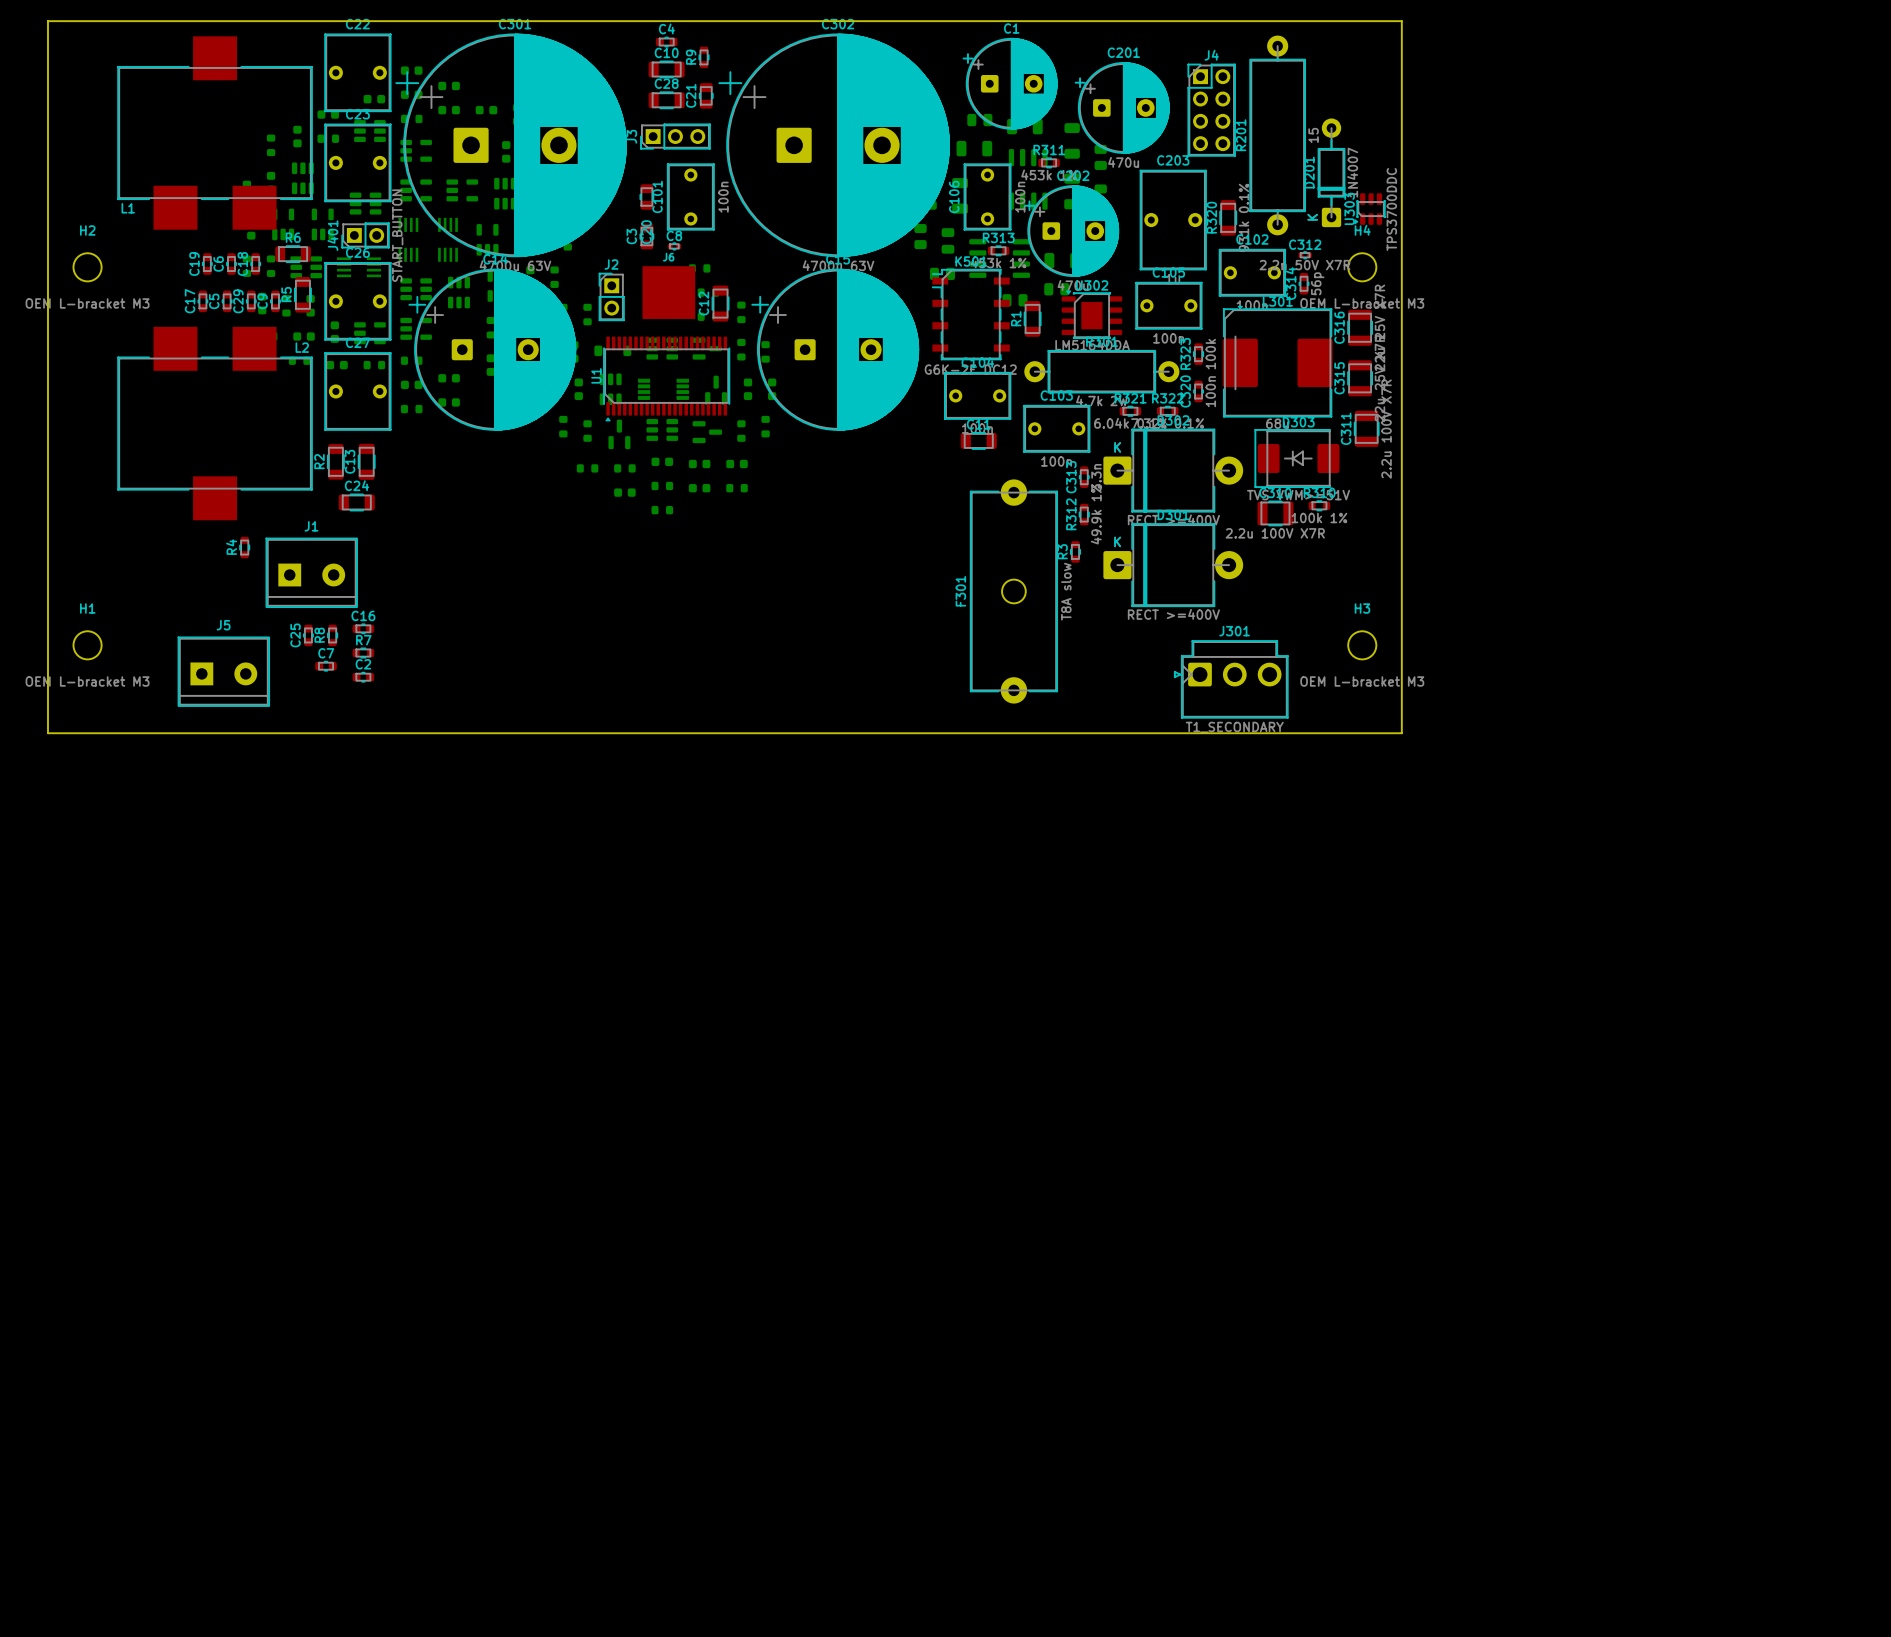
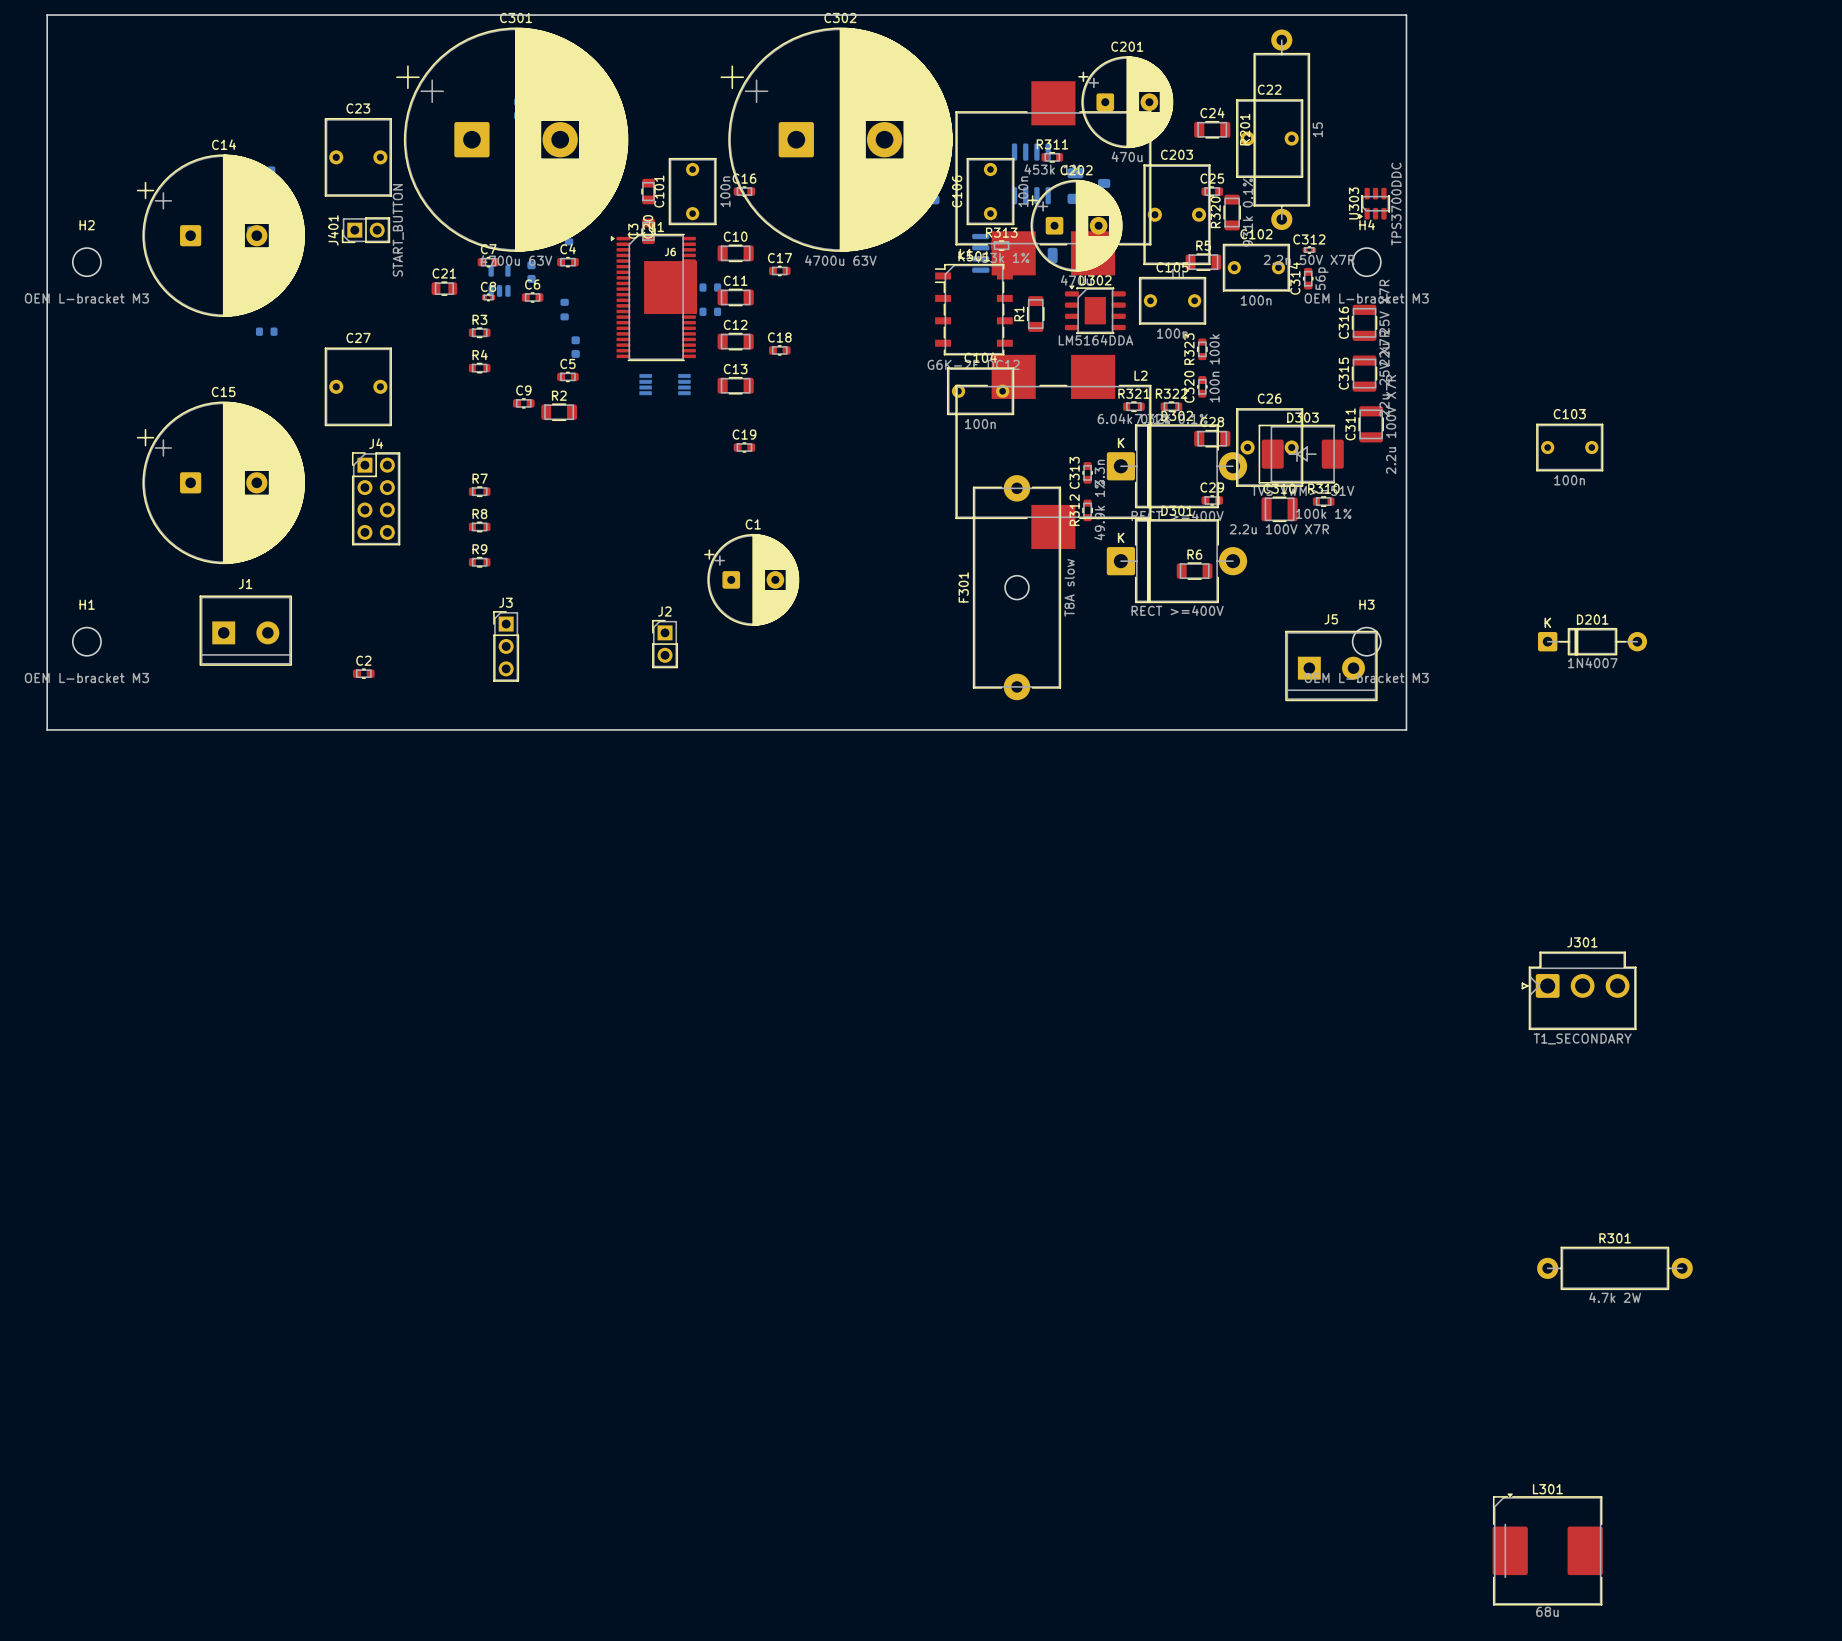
C4 position: (666, 42) -> (567, 262)
R9 rotation: 0° (704, 57) -> 90° clockwise (479, 562)
R9 position: (704, 57) -> (479, 562)
C10 position: (666, 69) -> (735, 253)
part: (411, 70) -> none
C22 position: (357, 72) -> (1269, 138)
C1 position: (1010, 83) -> (751, 579)
part: (449, 85) -> none
part: (411, 94) -> none
C21 rotation: 0° (706, 95) -> 90° clockwise (444, 288)
C21 position: (706, 95) -> (444, 288)
part: (374, 99) -> none
C28 position: (666, 100) -> (1212, 438)
part: (449, 110) -> none
part: (486, 110) -> none
J4 position: (1211, 110) -> (376, 498)
part: (328, 114) -> none
part: (411, 118) -> none
part: (979, 120) -> none
part: (1024, 126) -> none
part: (369, 131) -> none
L1 position: (215, 133) -> (1053, 178)
part: (297, 136) -> none
J3 rotation: 0° (675, 136) -> 90° clockwise (506, 646)
J3 position: (675, 136) -> (506, 646)
part: (328, 138) -> none
part: (1072, 140) -> none
part: (271, 145) -> none
part: (974, 148) -> none
part: (416, 150) -> none
part: (506, 151) -> none
part: (1100, 157) -> none
D201 rotation: 0° (1331, 172) -> 90° clockwise (1592, 641)
D201 position: (1331, 172) -> (1592, 641)
part: (302, 178) -> none
part: (416, 190) -> none
part: (462, 190) -> none
part: (505, 193) -> none
part: (960, 195) -> none
part: (365, 203) -> none
part: (283, 224) -> none
part: (322, 224) -> none
part: (920, 236) -> none
part: (408, 239) -> none
part: (447, 239) -> none
part: (487, 239) -> none
part: (947, 240) -> none
C8 position: (674, 246) -> (488, 297)
R6 position: (293, 254) -> (1194, 571)
C19 rotation: 0° (207, 264) -> 90° clockwise (744, 447)
C19 position: (207, 264) -> (744, 447)
C6 rotation: 0° (231, 264) -> 90° clockwise (532, 297)
C6 position: (231, 264) -> (532, 297)
C18 rotation: 0° (255, 264) -> 90° clockwise (779, 350)
C18 position: (255, 264) -> (779, 350)
part: (246, 266) -> none
part: (271, 266) -> none
part: (306, 267) -> none
part: (358, 267) -> none
part: (699, 268) -> none
part: (942, 273) -> none
part: (554, 277) -> none
part: (416, 289) -> none
part: (1056, 289) -> none
part: (458, 292) -> none
R5 rotation: 0° (302, 294) -> 90° clockwise (1203, 262)
R5 position: (302, 294) -> (1203, 262)
J2 position: (611, 296) -> (665, 644)
part: (1015, 300) -> none
C17 rotation: 0° (202, 301) -> 90° clockwise (779, 270)
C17 position: (202, 301) -> (779, 270)
C5 rotation: 0° (227, 301) -> 90° clockwise (567, 376)
C5 position: (227, 301) -> (567, 376)
C29 rotation: 0° (251, 301) -> 90° clockwise (1212, 500)
C29 position: (251, 301) -> (1212, 500)
C9 rotation: 0° (275, 301) -> 90° clockwise (523, 403)
C9 position: (275, 301) -> (523, 403)
C26 position: (357, 301) -> (1269, 447)
part: (262, 303) -> none
C12 rotation: 0° (720, 303) -> 90° clockwise (735, 341)
C12 position: (720, 303) -> (735, 341)
part: (286, 305) -> none
part: (310, 305) -> none
part: (741, 312) -> none
part: (587, 314) -> none
part: (490, 327) -> none
part: (416, 328) -> none
part: (334, 332) -> none
part: (369, 333) -> none
part: (304, 336) -> none
part: (662, 348) -> none
part: (707, 348) -> none
C14 position: (492, 349) -> (220, 235)
part: (741, 349) -> none
C15 position: (835, 349) -> (220, 482)
part: (612, 350) -> none
part: (765, 351) -> none
part: (299, 360) -> none
part: (411, 360) -> none
L301 position: (1277, 361) -> (1547, 1549)
part: (337, 365) -> none
part: (374, 365) -> none
part: (490, 365) -> none
R301 position: (1101, 371) -> (1614, 1268)
part: (449, 378) -> none
U1 rotation: 0° (666, 378) -> 90° clockwise (653, 297)
U1 position: (666, 378) -> (653, 297)
part: (411, 384) -> none
part: (578, 389) -> none
part: (610, 389) -> none
part: (747, 389) -> none
part: (772, 389) -> none
part: (716, 390) -> none
part: (449, 402) -> none
part: (411, 409) -> none
L2 position: (215, 423) -> (1053, 451)
part: (563, 426) -> none
part: (765, 426) -> none
C103 position: (1056, 428) -> (1569, 447)
part: (662, 429) -> none
part: (587, 431) -> none
part: (741, 431) -> none
part: (707, 432) -> none
part: (619, 434) -> none
C11 position: (978, 440) -> (735, 297)
R2 rotation: 0° (335, 461) -> 90° clockwise (559, 412)
R2 position: (335, 461) -> (559, 412)
C13 rotation: 0° (366, 461) -> 90° clockwise (735, 385)
C13 position: (366, 461) -> (735, 385)
part: (662, 461) -> none
part: (699, 464) -> none
part: (737, 464) -> none
part: (587, 468) -> none
part: (624, 468) -> none
part: (662, 485) -> none
part: (699, 488) -> none
part: (737, 488) -> none
part: (624, 492) -> none
C24 position: (356, 502) -> (1212, 129)
part: (662, 510) -> none
R4 rotation: 0° (244, 547) -> 90° clockwise (479, 368)
R4 position: (244, 547) -> (479, 368)
R3 rotation: 0° (1075, 551) -> 90° clockwise (479, 332)
R3 position: (1075, 551) -> (479, 332)
J1 position: (311, 572) -> (245, 630)
C16 position: (363, 628) -> (744, 191)
C25 rotation: 0° (308, 635) -> 90° clockwise (1212, 191)
C25 position: (308, 635) -> (1212, 191)
R8 rotation: 0° (332, 635) -> 90° clockwise (479, 526)
R8 position: (332, 635) -> (479, 526)
R7 position: (363, 653) -> (479, 491)
C7 position: (326, 666) -> (488, 262)
J5 position: (223, 671) -> (1331, 665)
J301 position: (1231, 679) -> (1579, 990)

